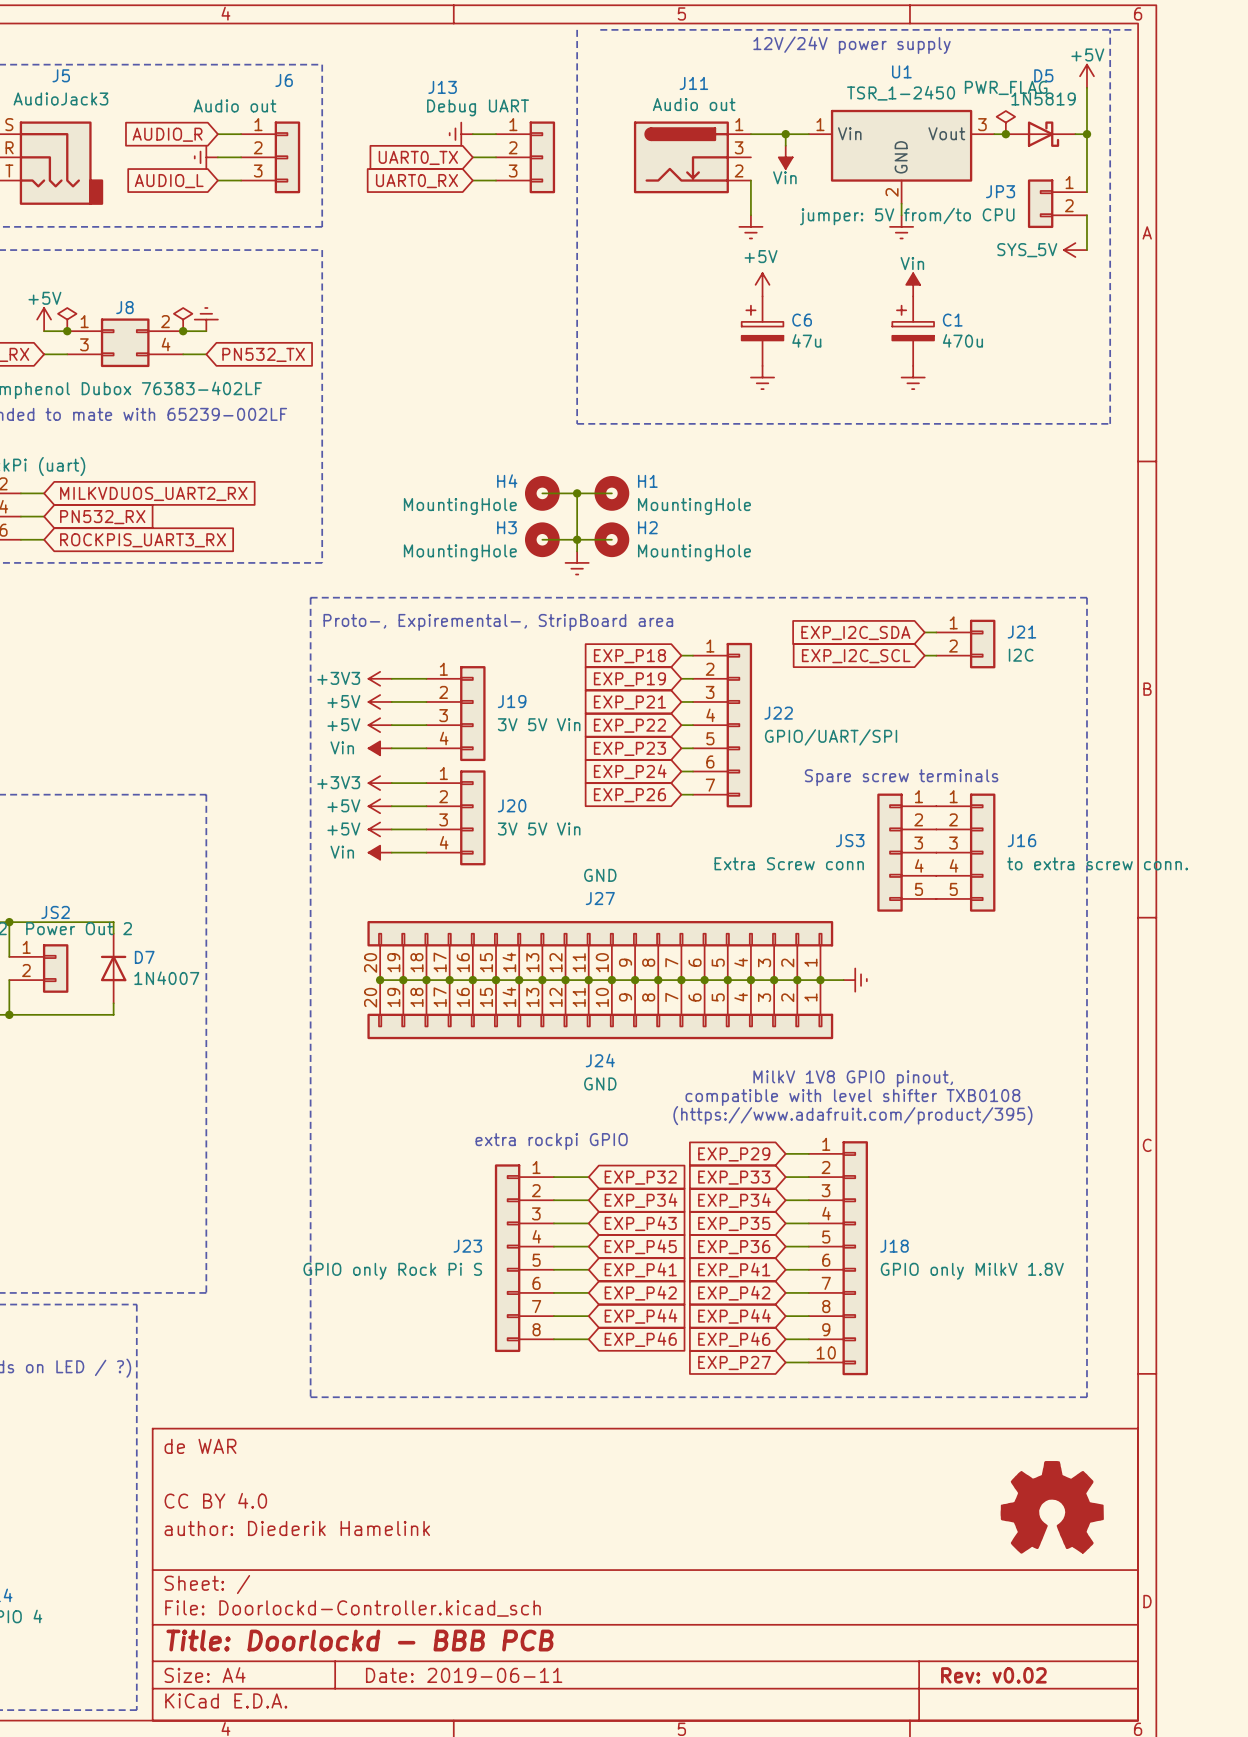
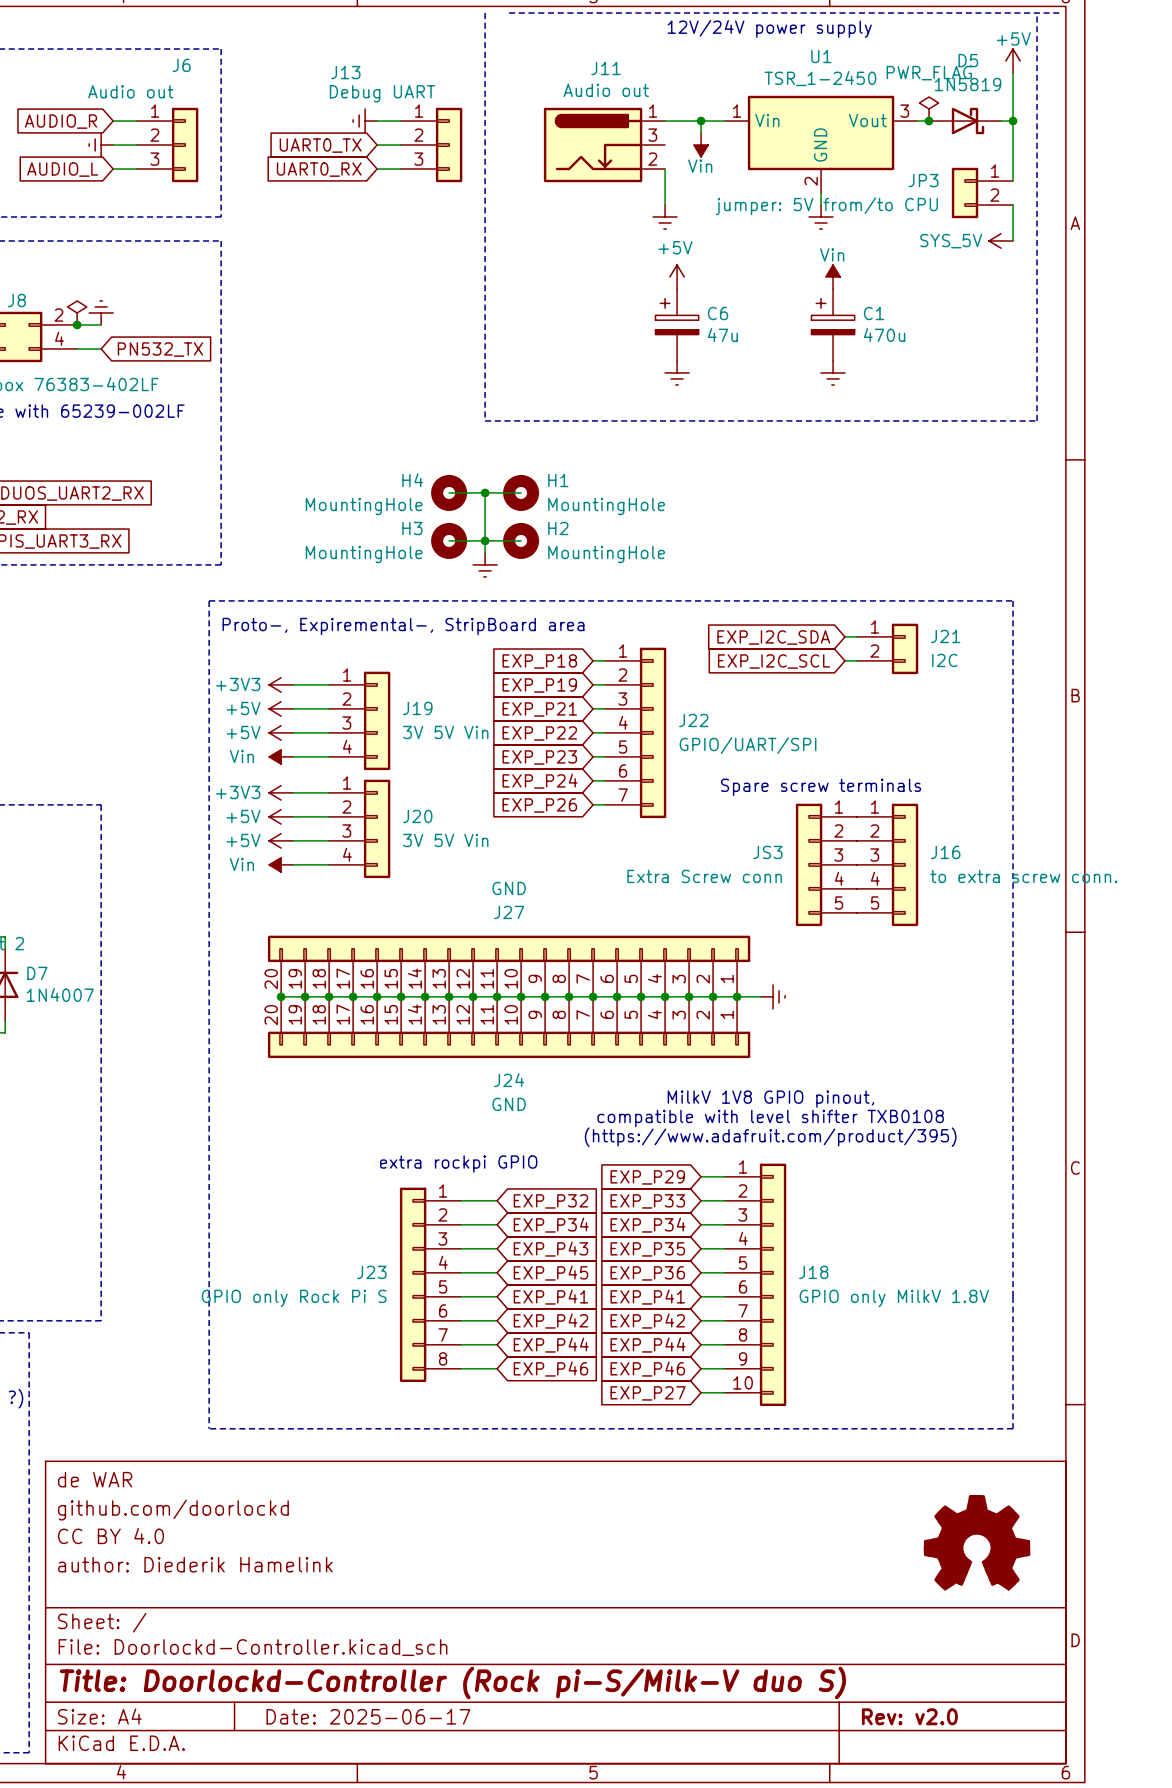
title block: none -> github.com/doorlockd (173, 1510)
title block: Title: Doorlockd - BBB PCB (360, 1640) -> Title: Doorlockd-Controller (Rock pi-S/Milk-V duo S) (452, 1682)
title block: Date: 2019-06-11 (464, 1675) -> Date: 2025-06-17 (368, 1716)
title block: Rev: v0.02 (993, 1675) -> Rev: v2.0 (909, 1716)

